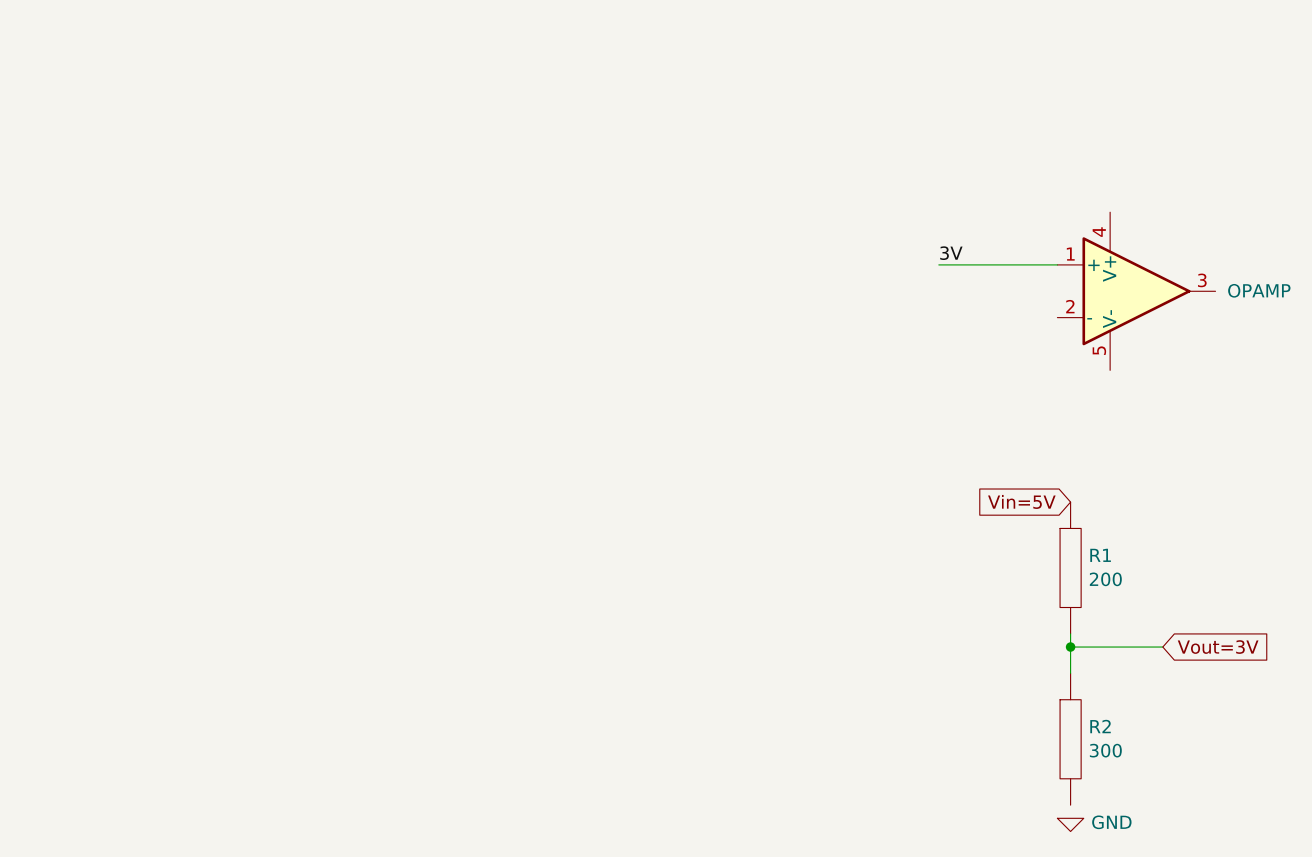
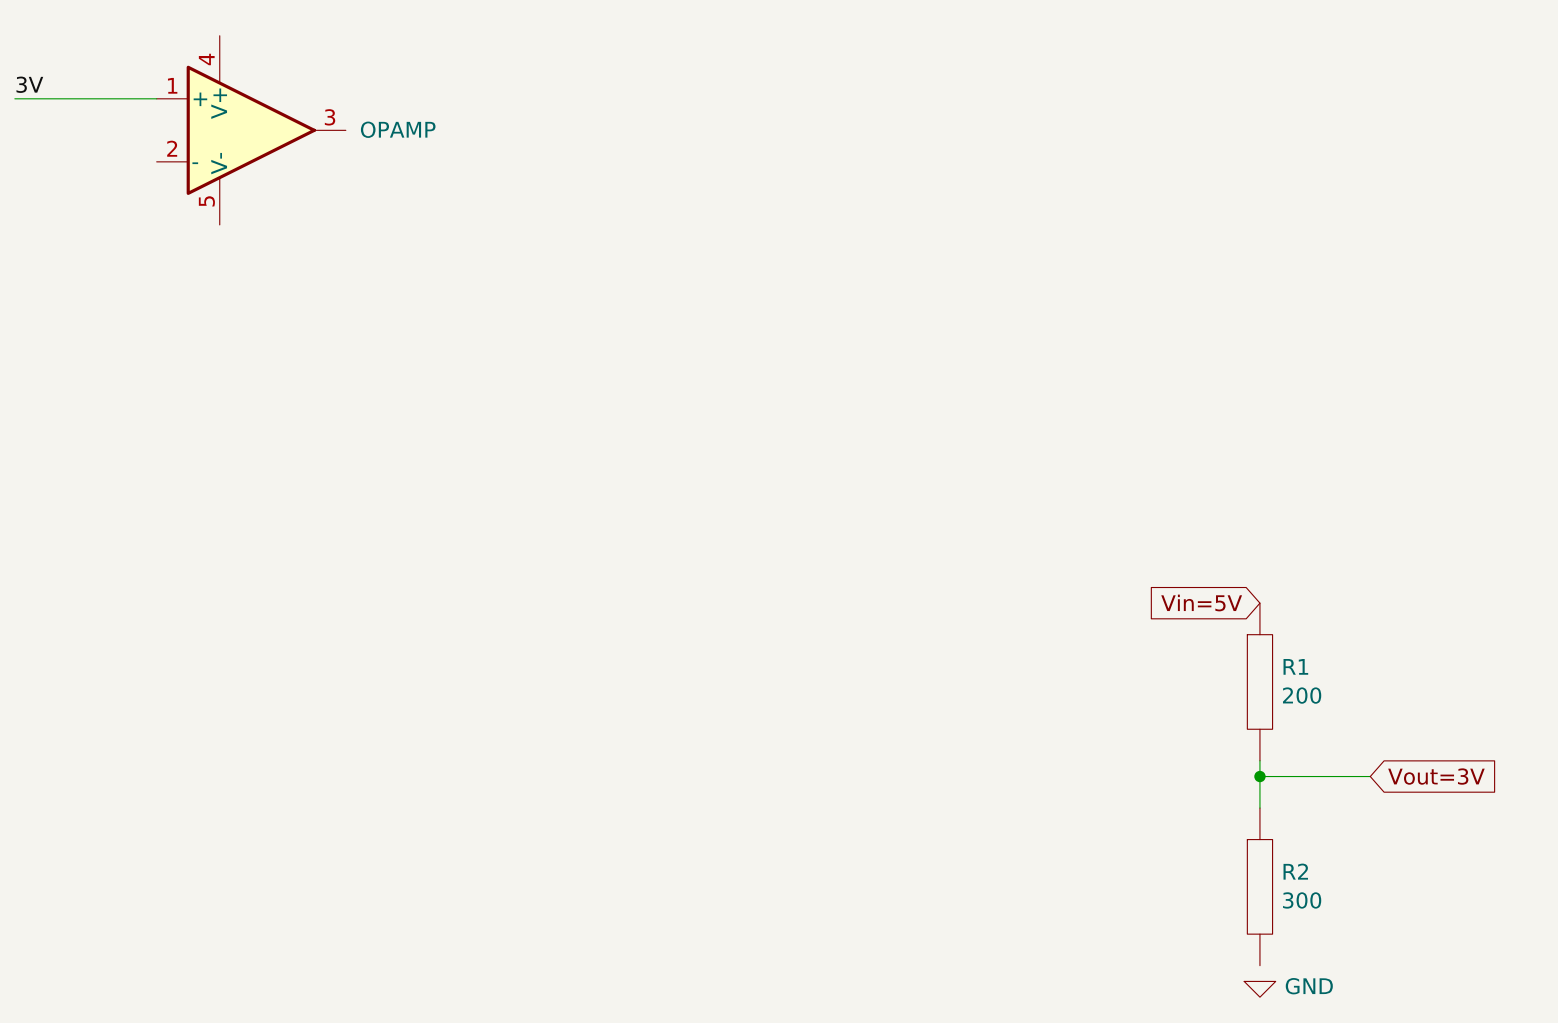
label: none -> 3V (29, 84)
wire: none -> (14, 98) (156, 98)
part: none -> OPAMP (251, 130)
label: 3V (951, 253) -> none
wire: (938, 264) (1057, 264) -> none
part: OPAMP (1136, 291) -> none

